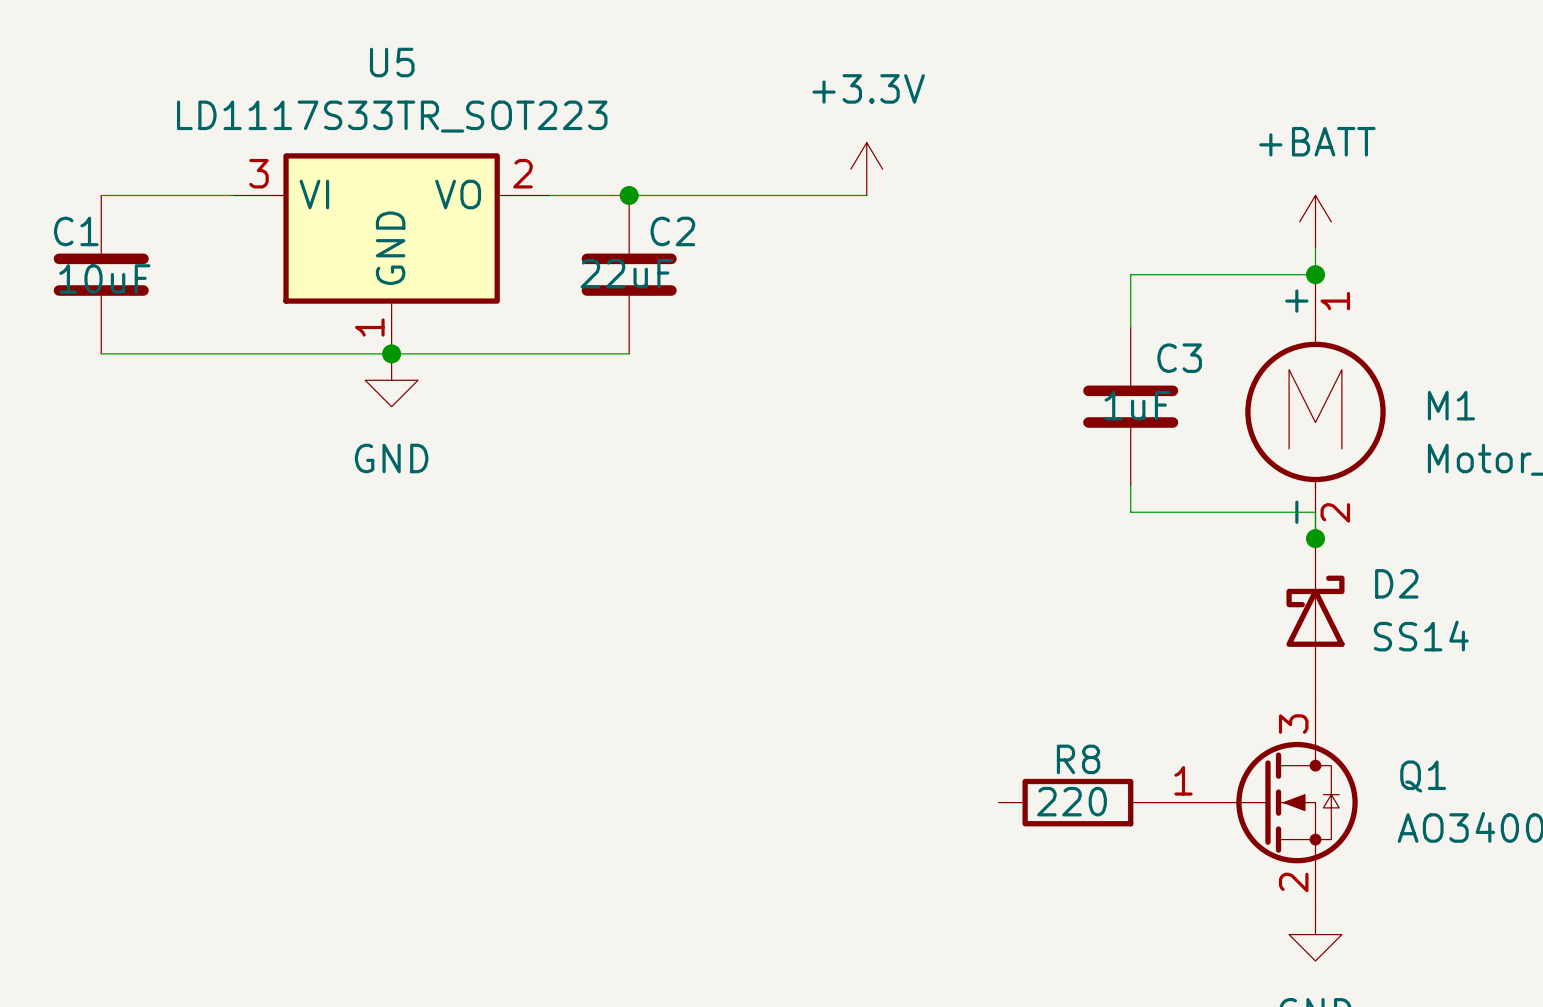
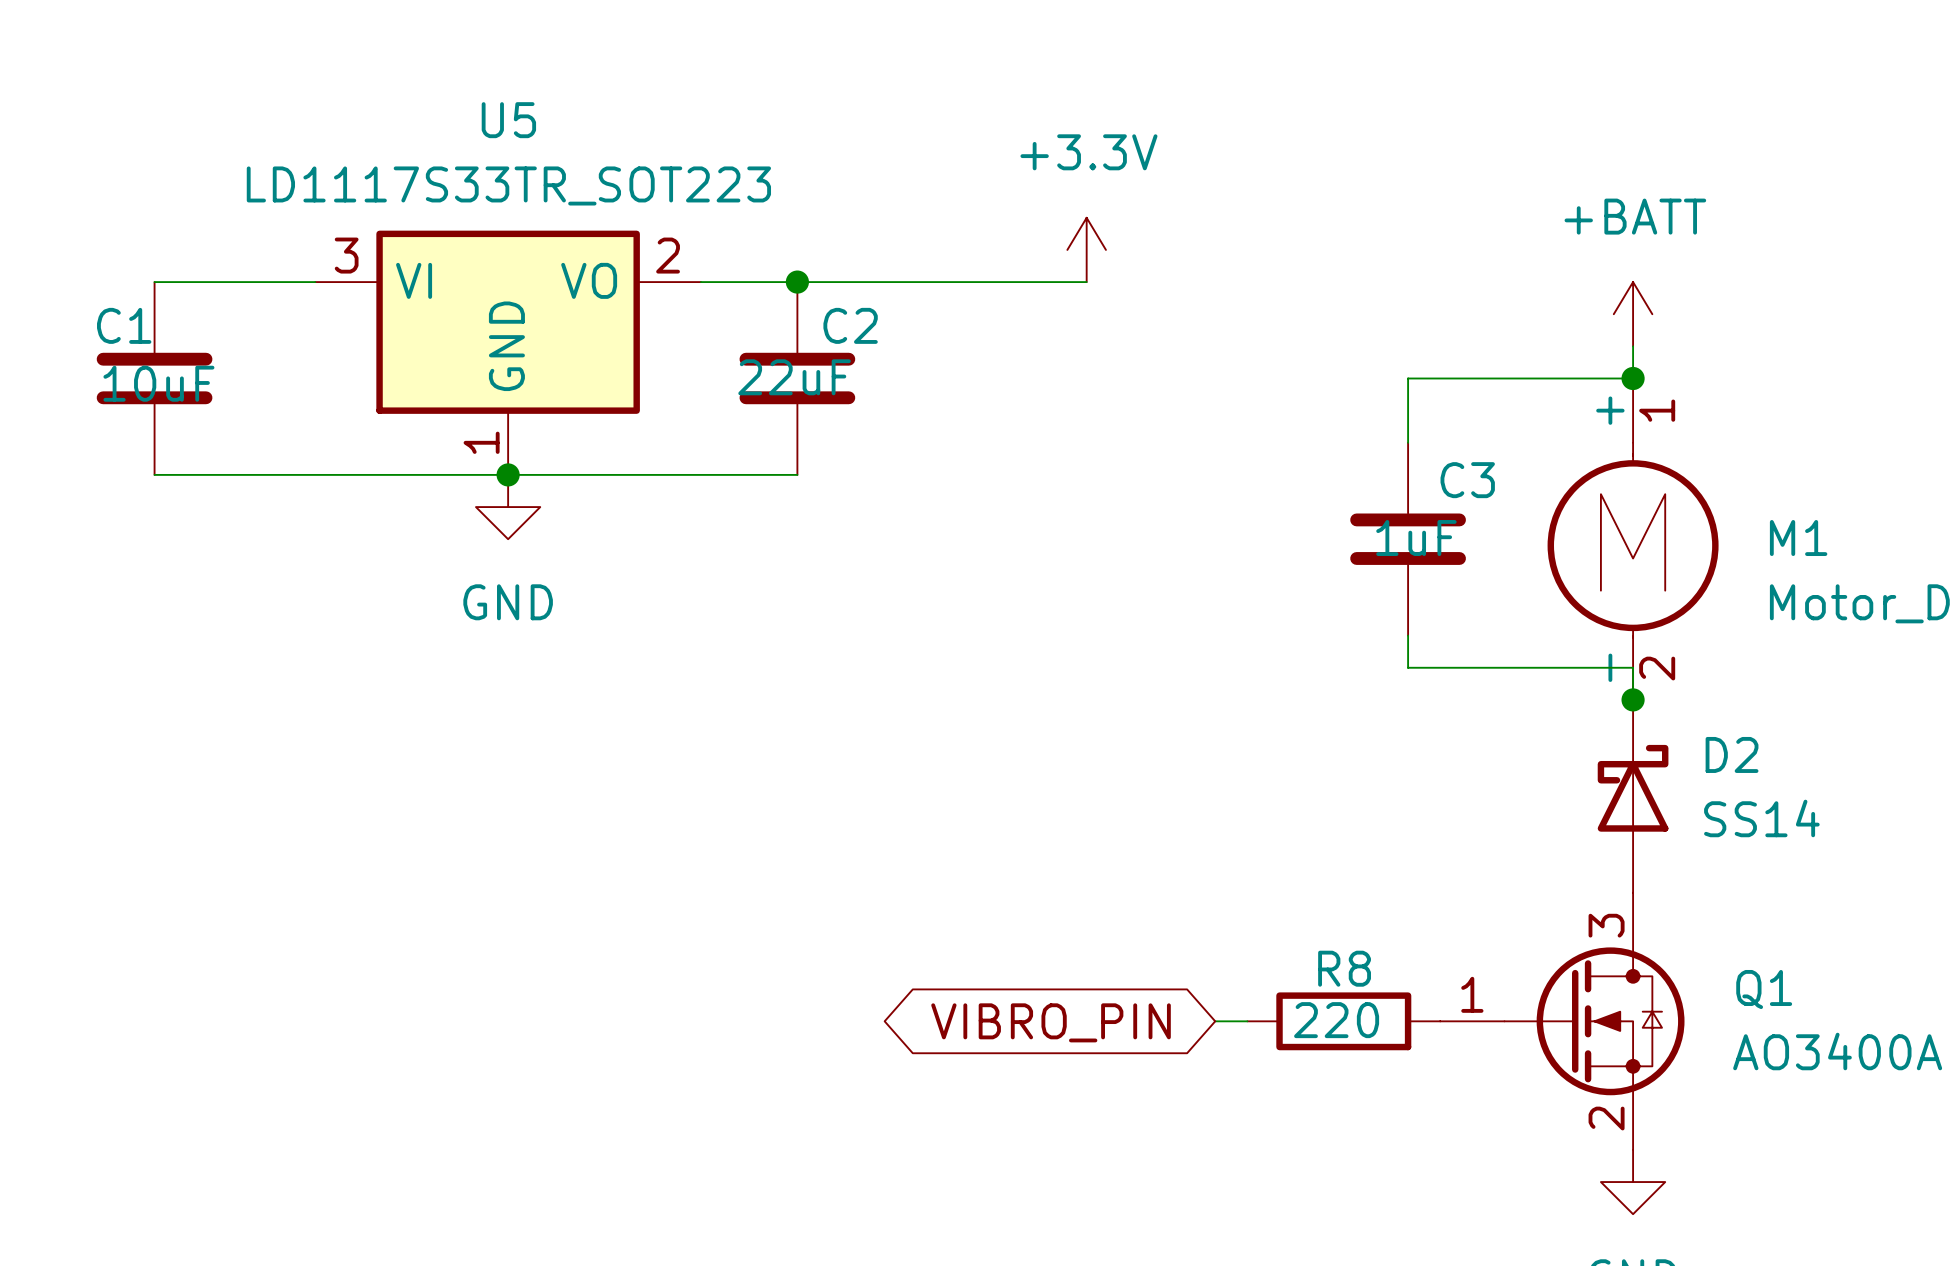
wire: none -> (1215, 1021) (1247, 1021)
global label: none -> VIBRO_PIN (1051, 1022)

